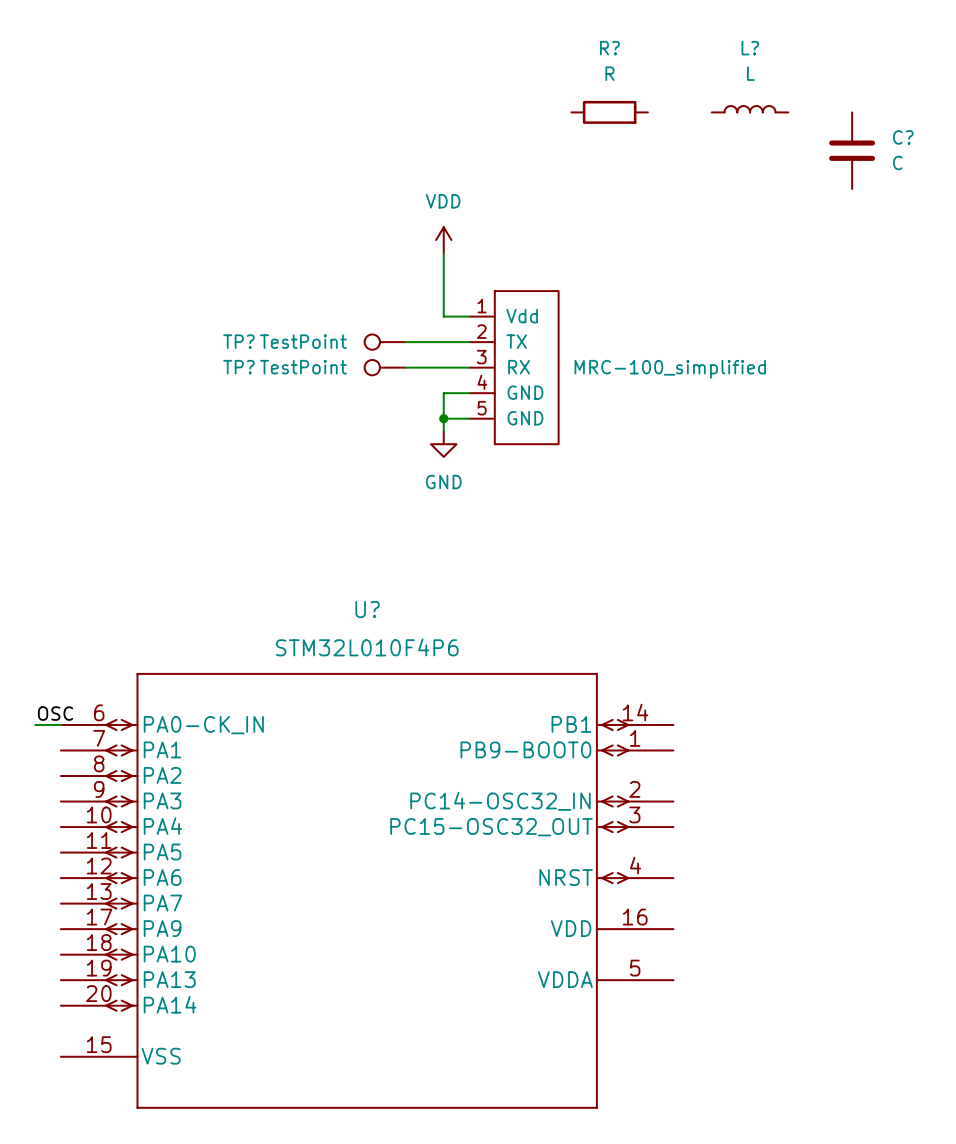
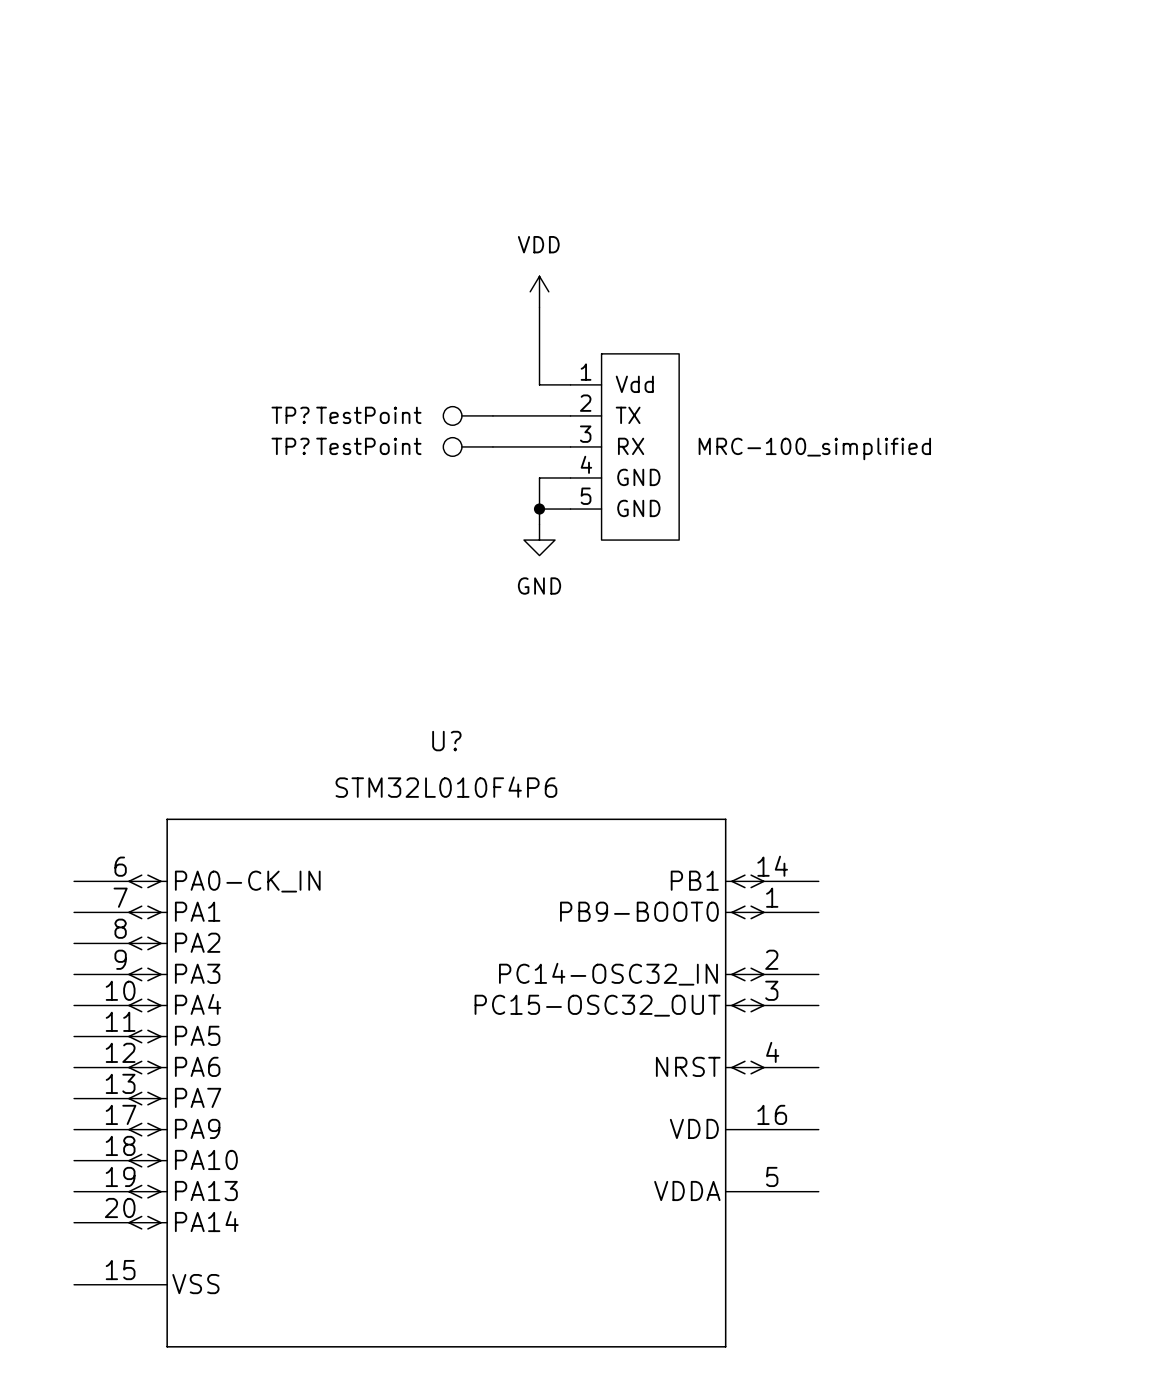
L?: L (750, 109) -> none
R?: R (609, 112) -> none
C?: C (852, 150) -> none
label: OSC (55, 713) -> none
wire: (35, 724) (60, 724) -> none

